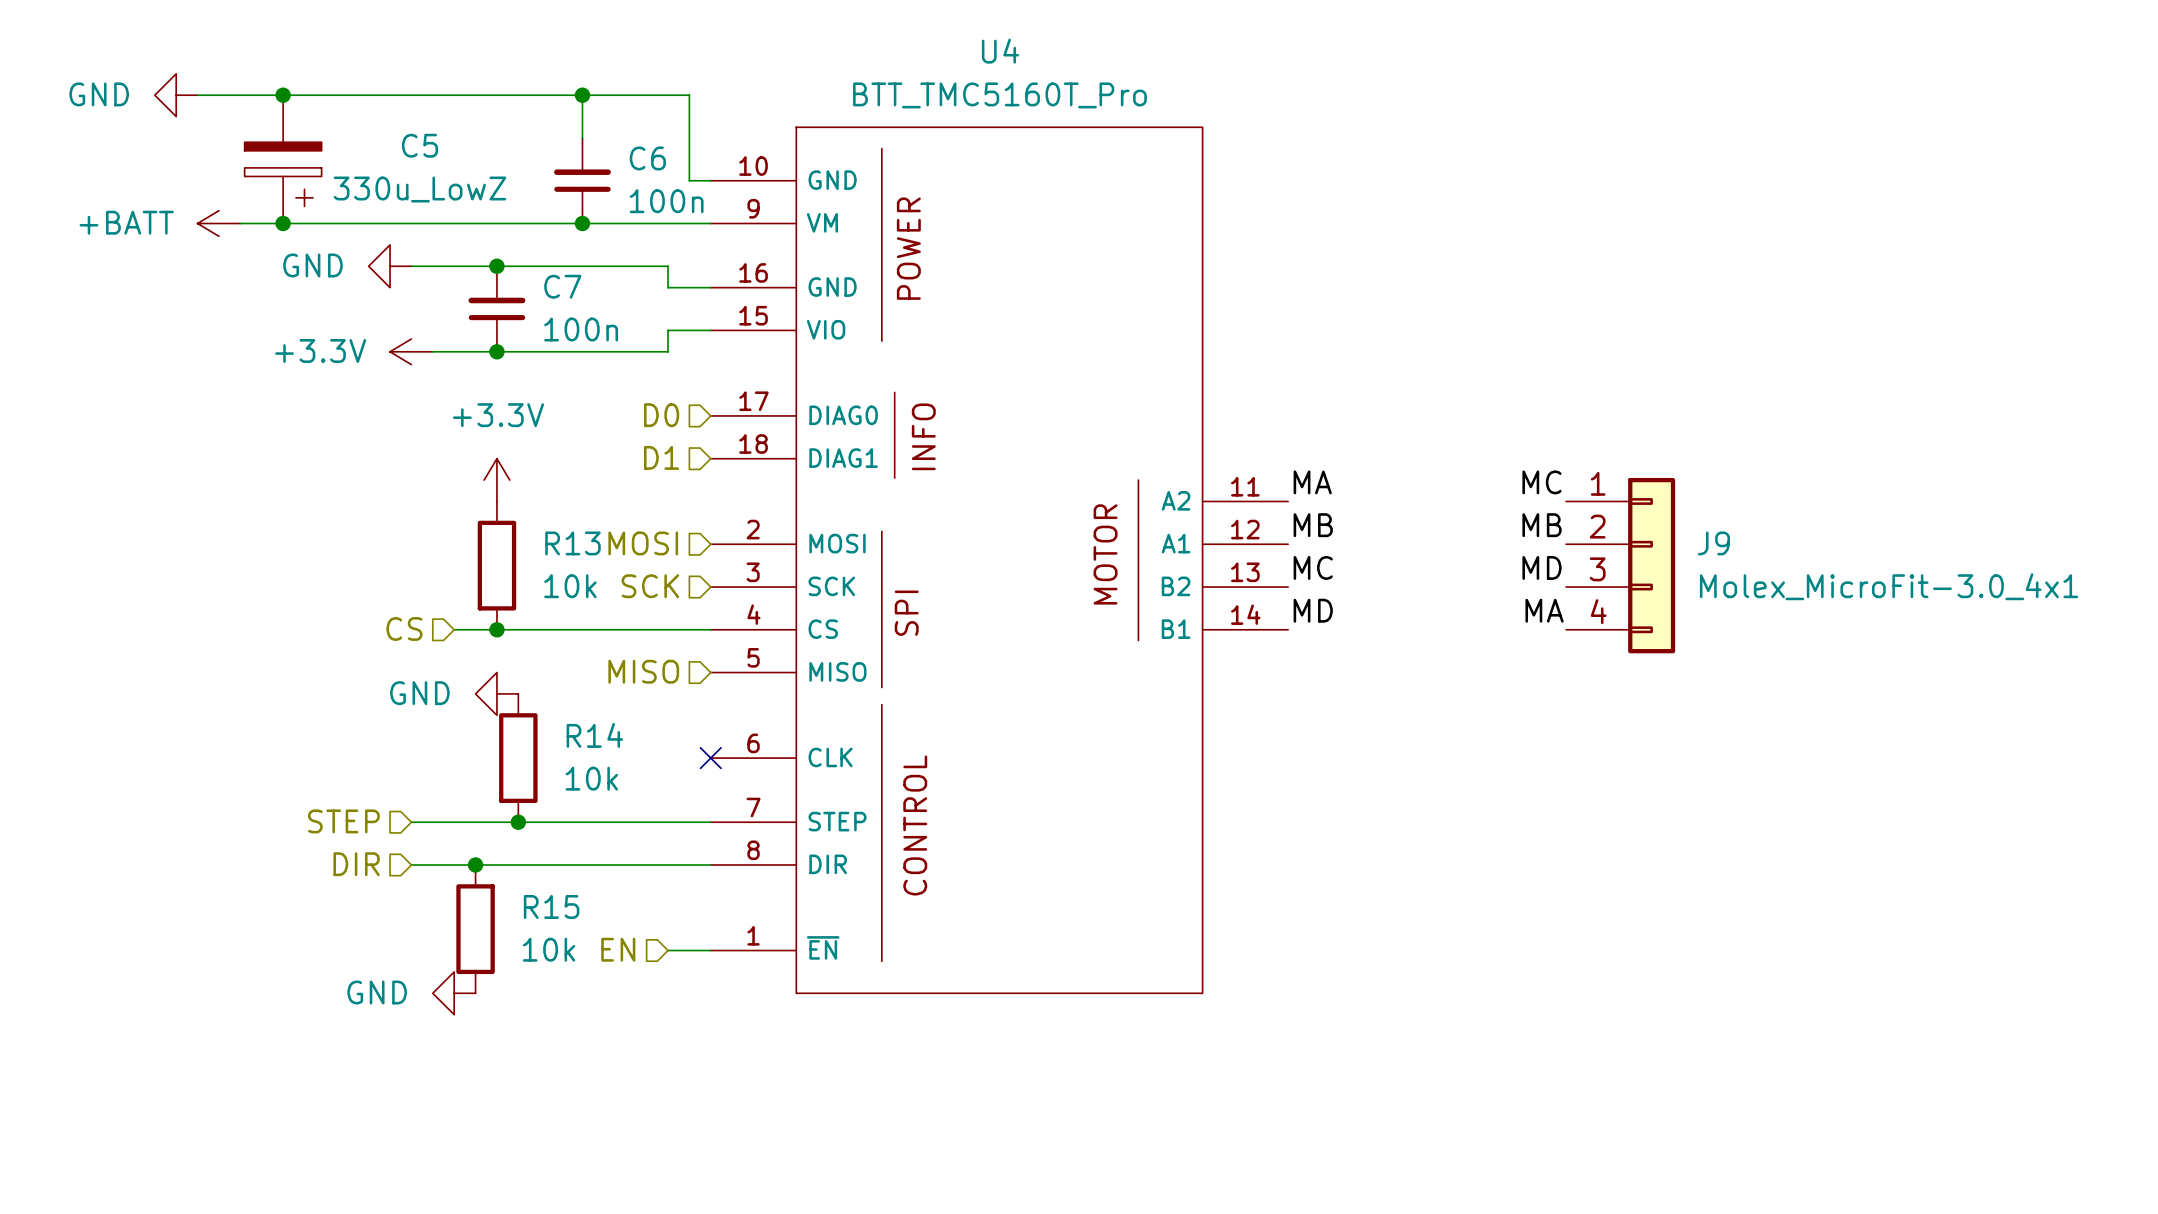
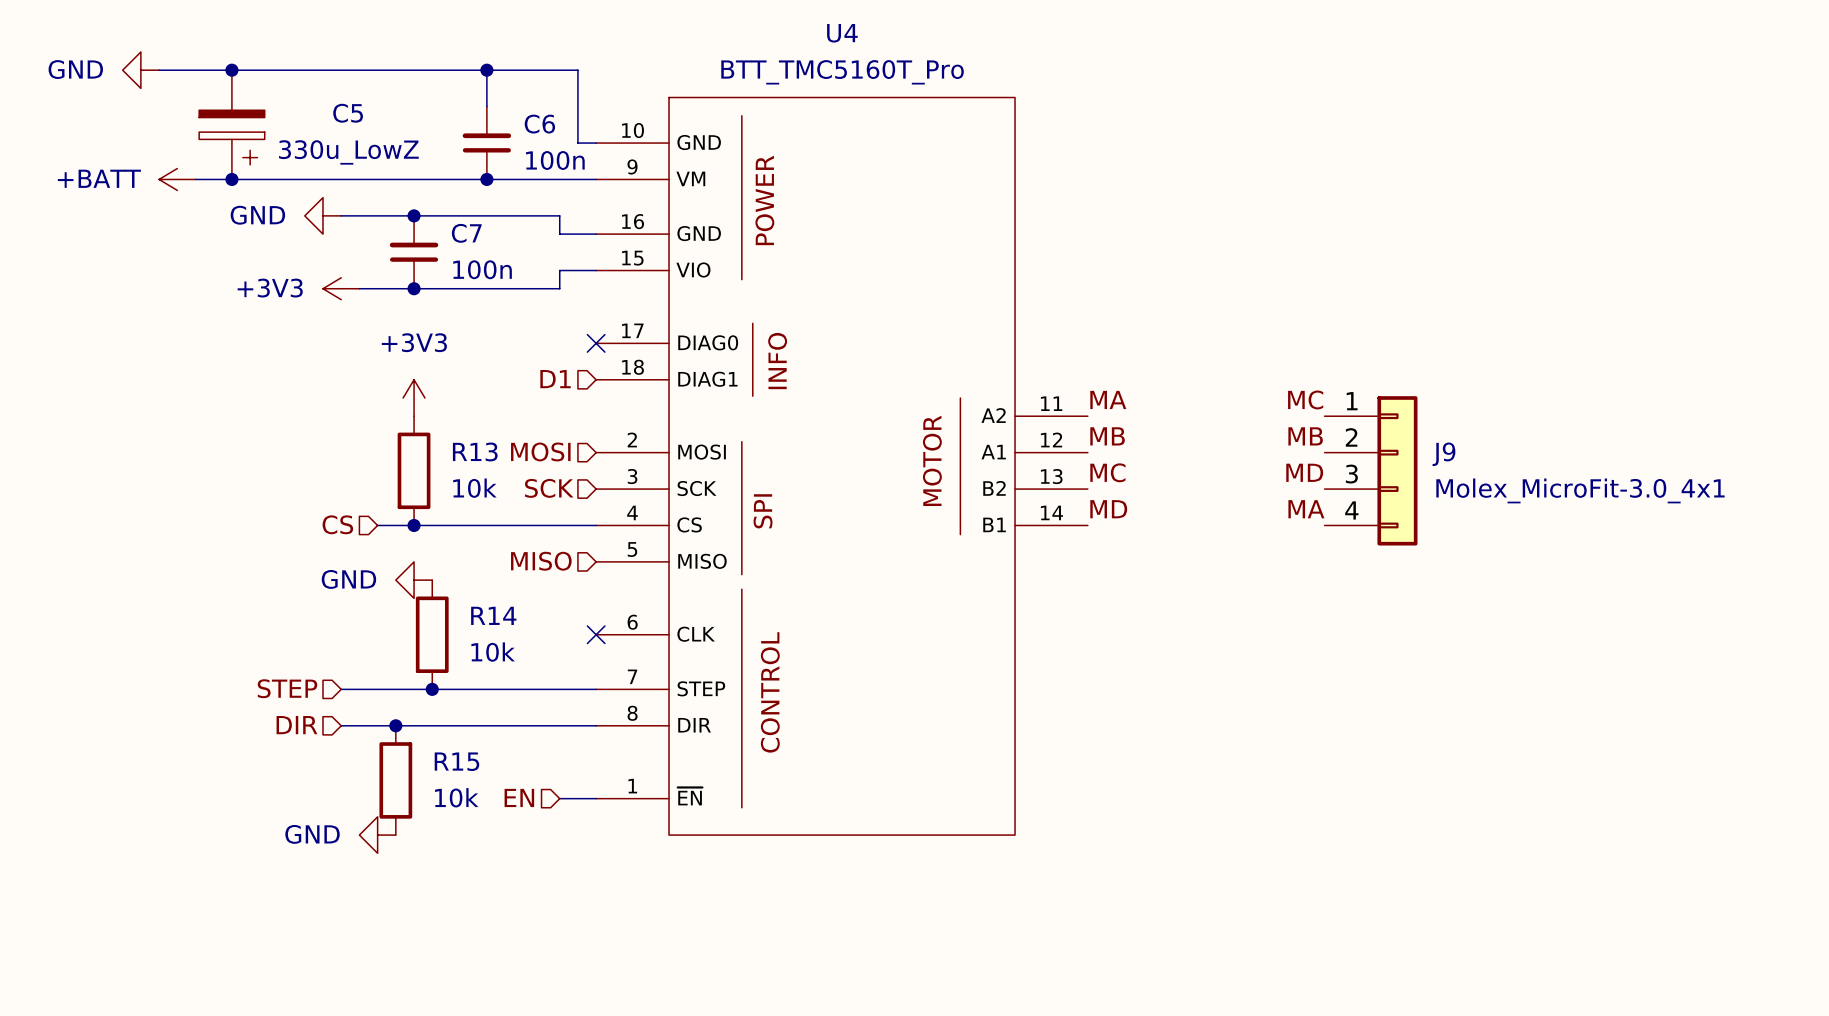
power symbol: +3.3V (411, 351) -> +3V3 (341, 288)
hierarchical label: D0 (661, 415) -> none
no-connect mark: none -> (596, 343)
power symbol: +3.3V (496, 480) -> +3V3 (414, 398)

